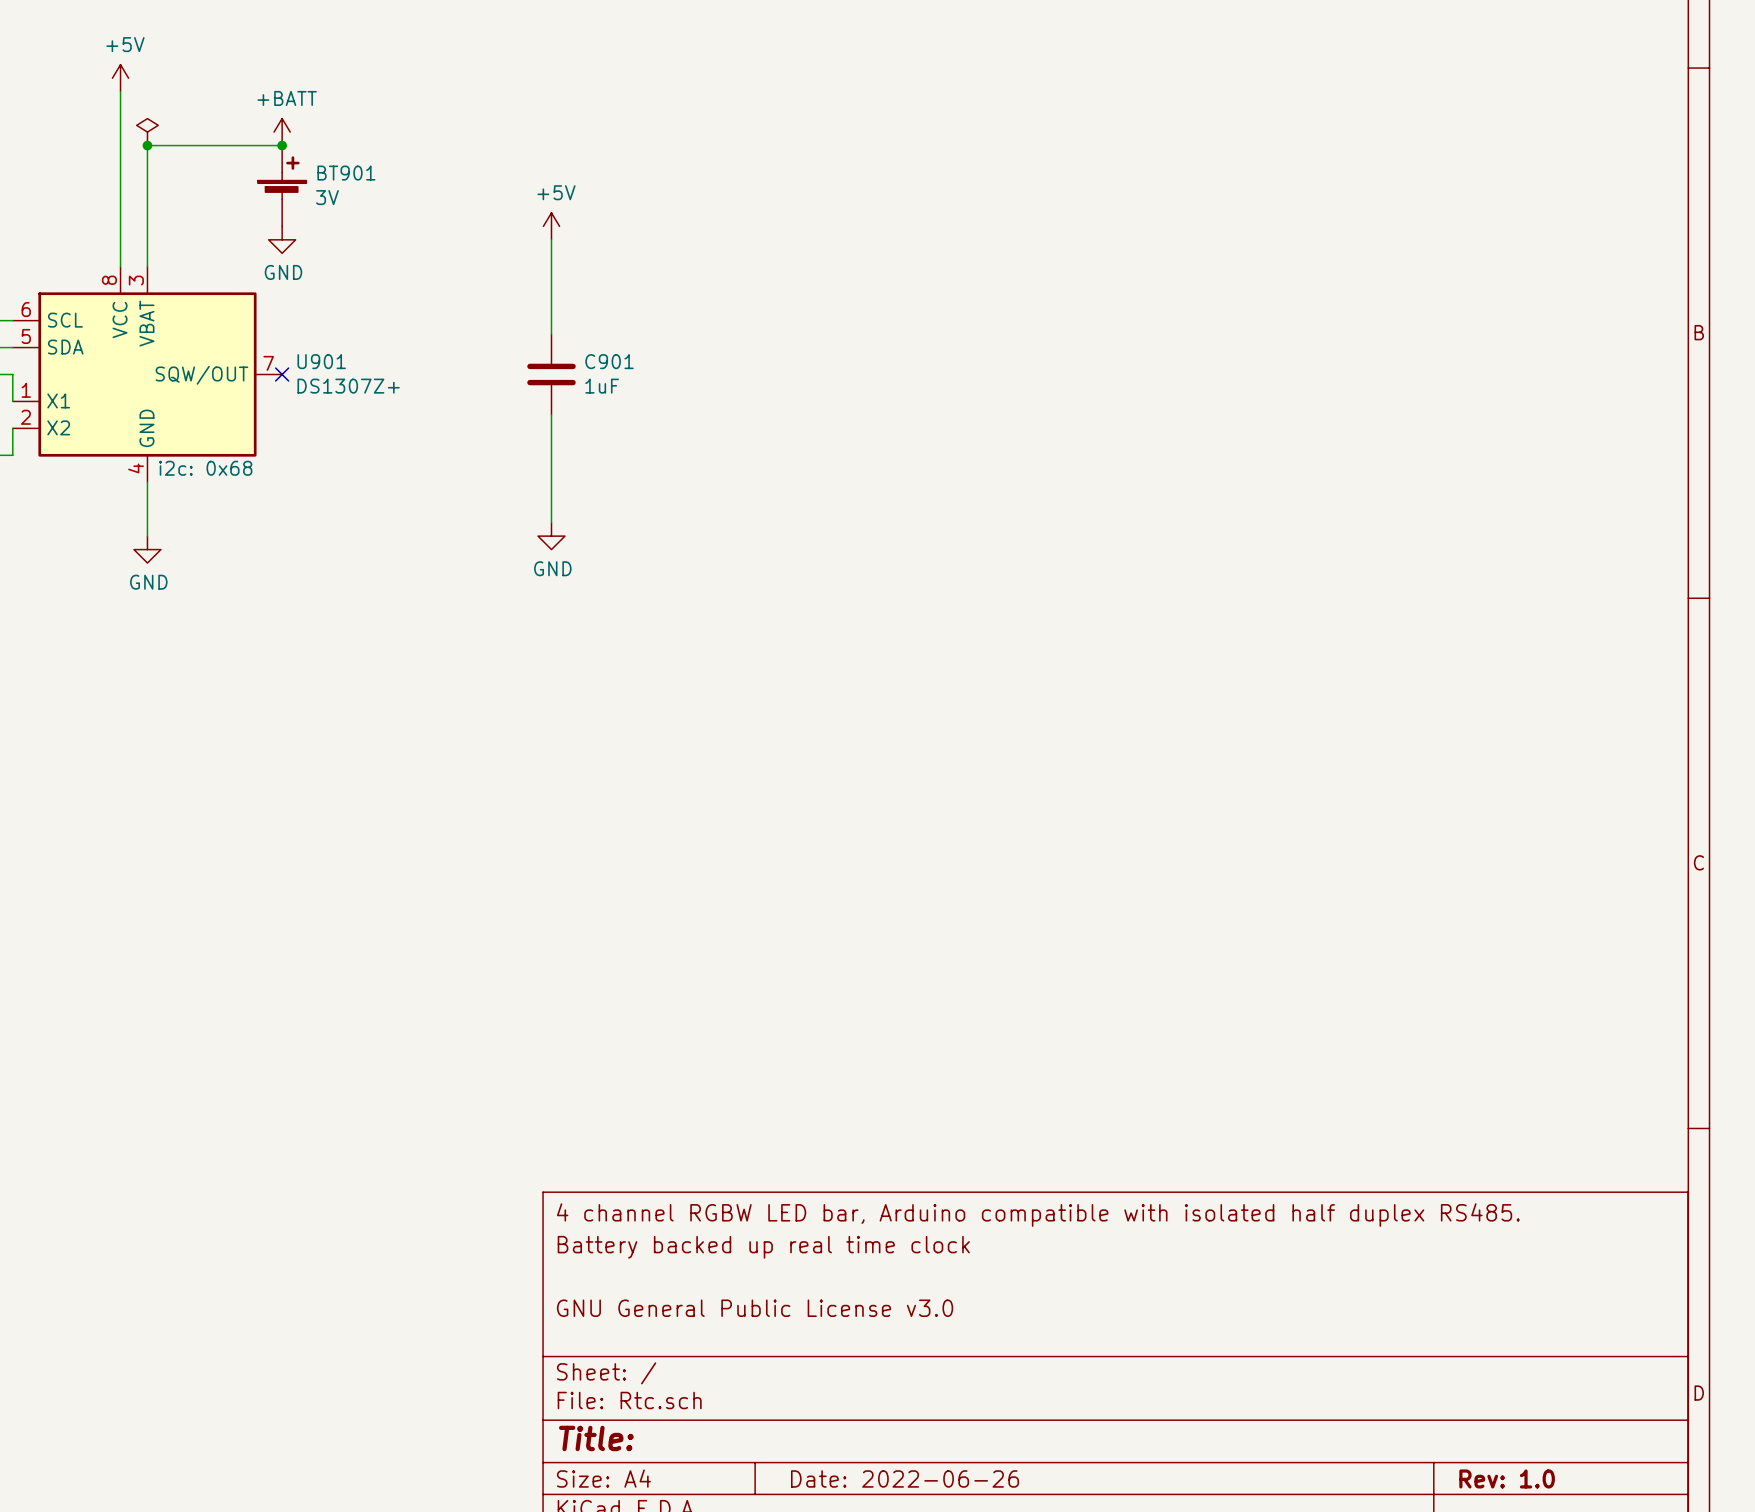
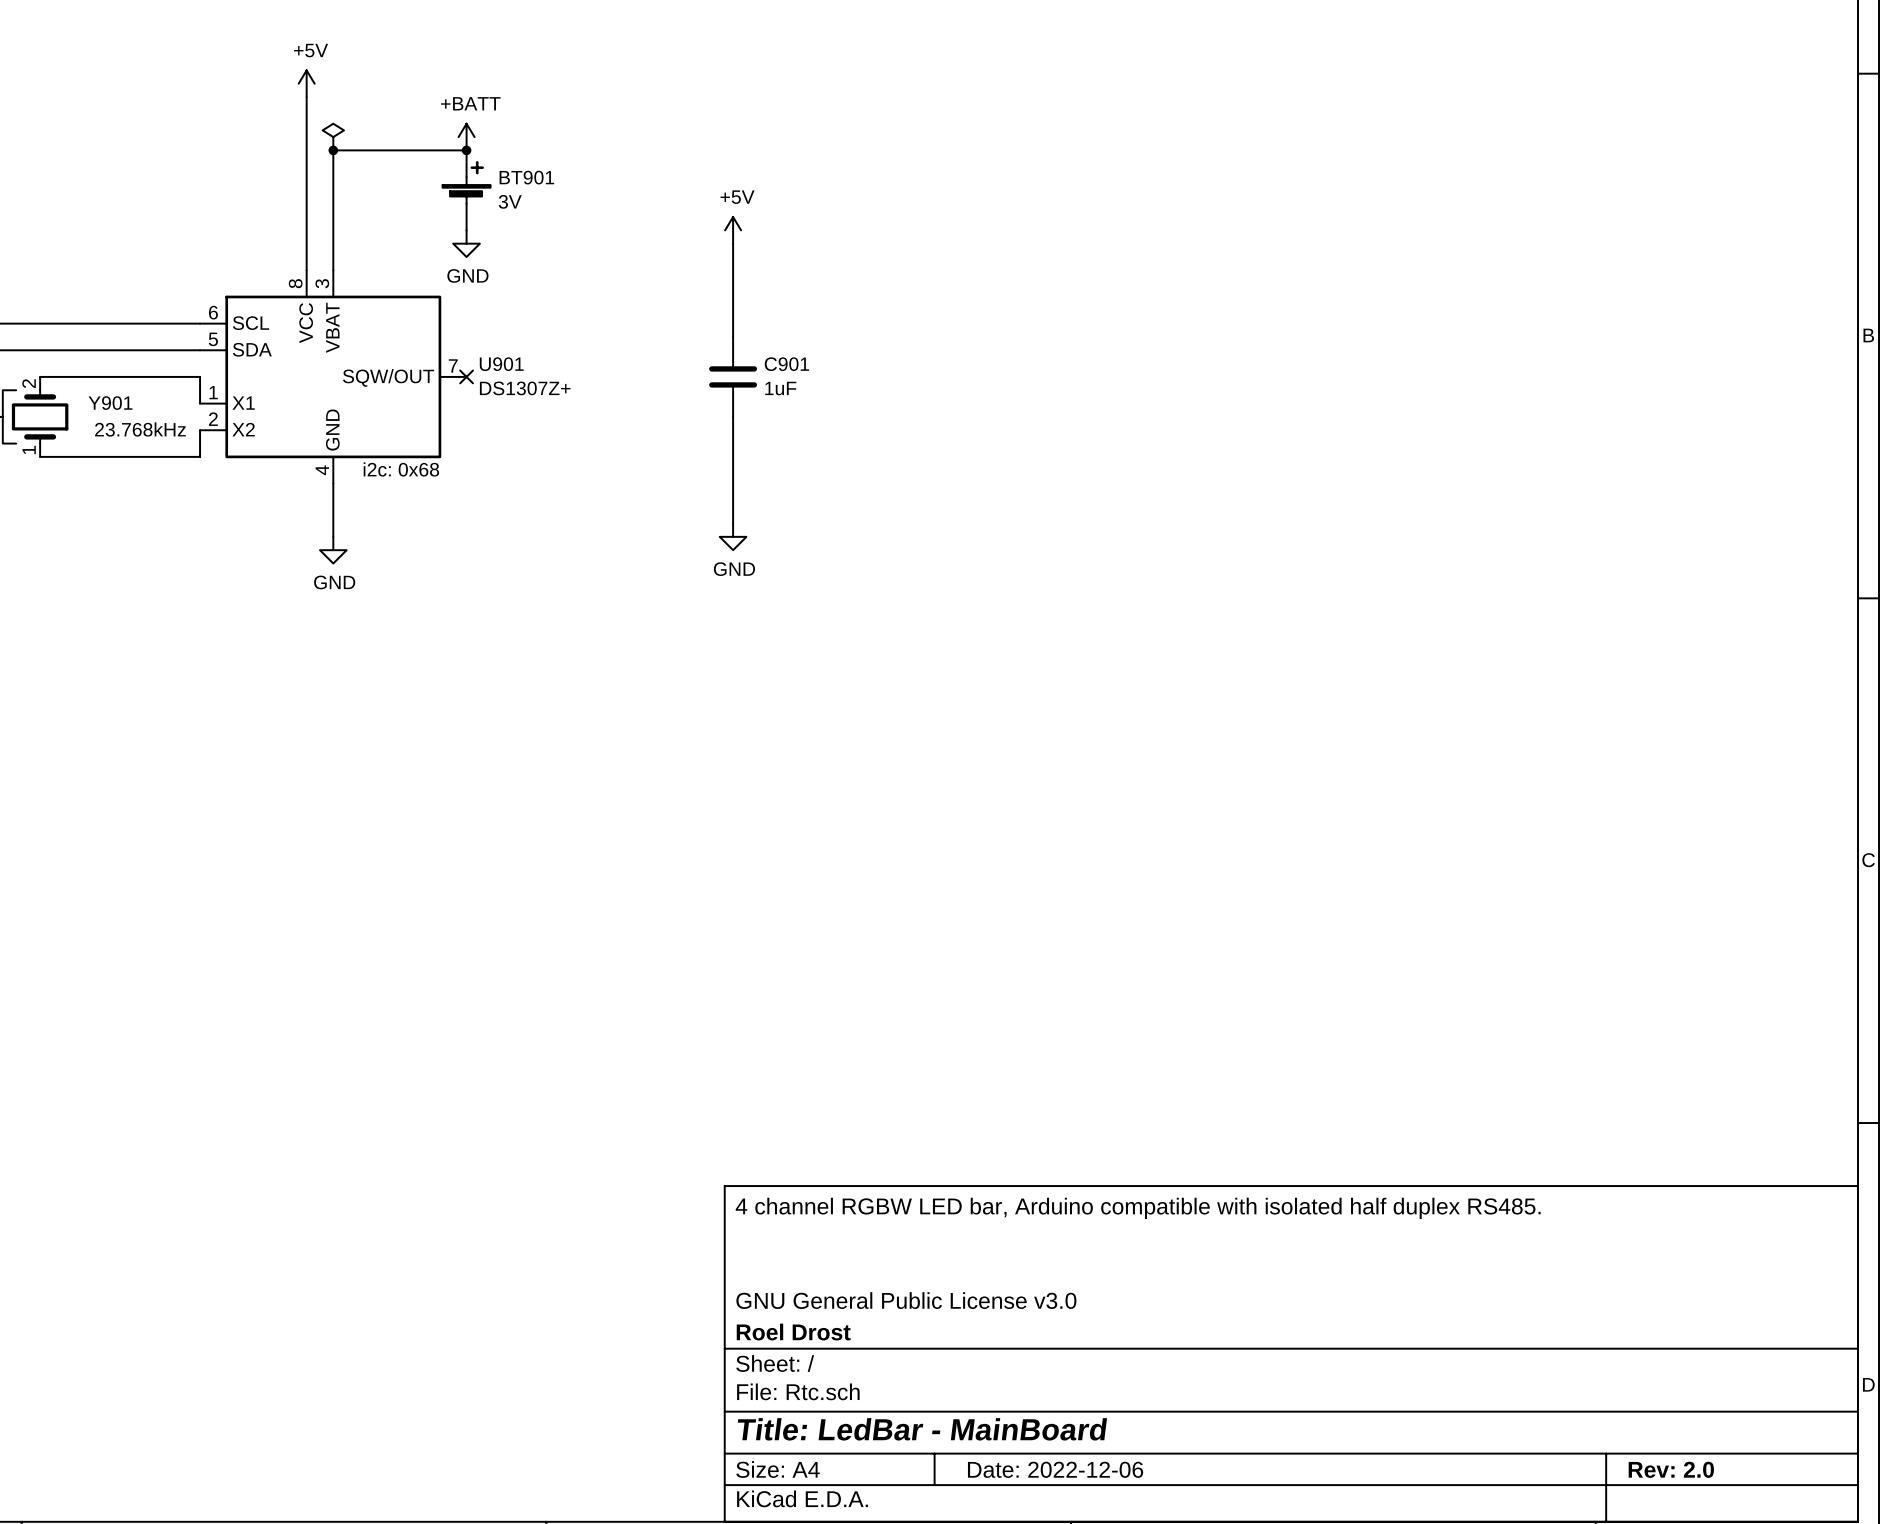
title block: Battery backed up real time clock (763, 1247) -> none
title block: none -> Roel Drost (793, 1332)
title block: Title: (596, 1438) -> Title: LedBar - MainBoard (922, 1429)
title block: Date: 2022-06-26 (905, 1478) -> Date: 2022-12-06 (1055, 1469)
title block: Rev: 1.0 (1507, 1478) -> Rev: 2.0 (1671, 1469)

